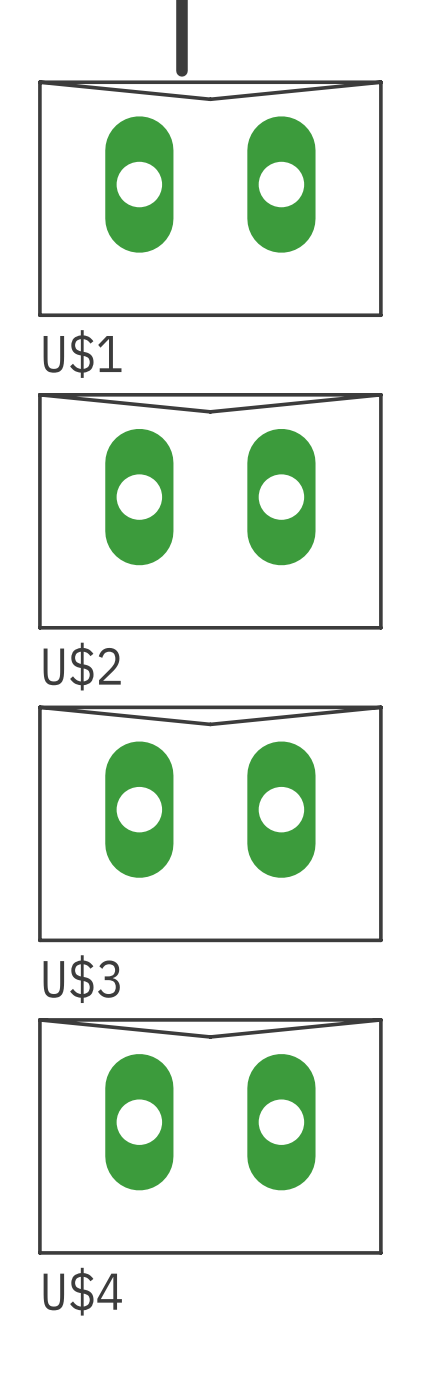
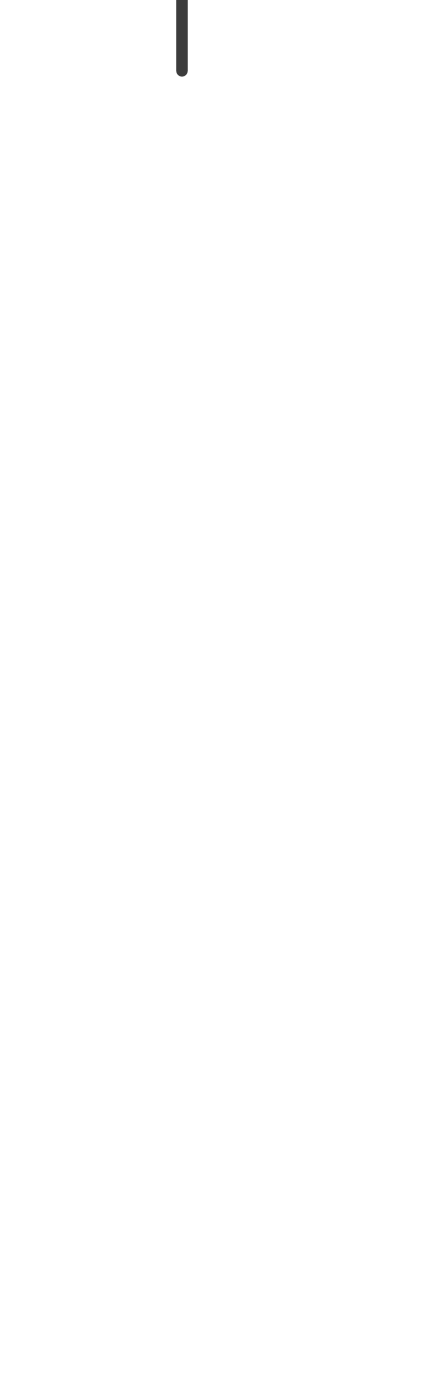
U$1: (210, 198) -> none
U$2: (210, 511) -> none
U$3: (210, 823) -> none
U$4: (210, 1136) -> none

